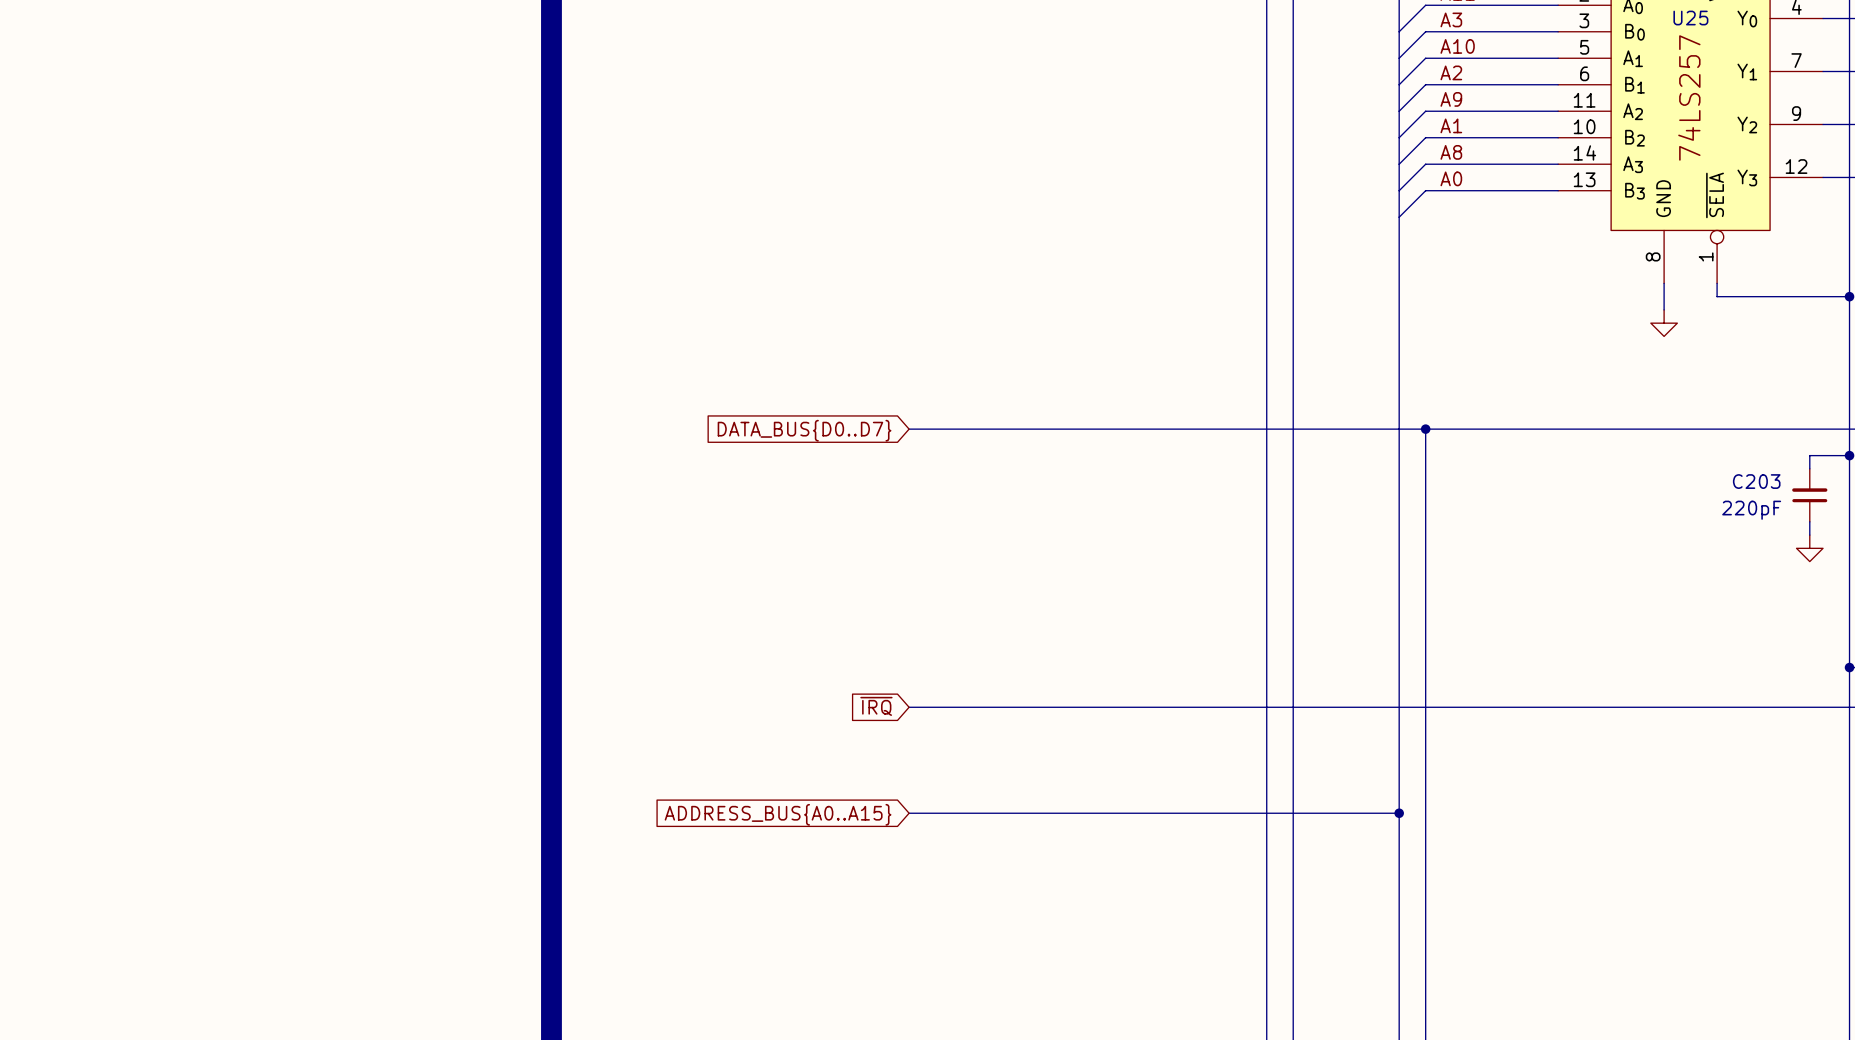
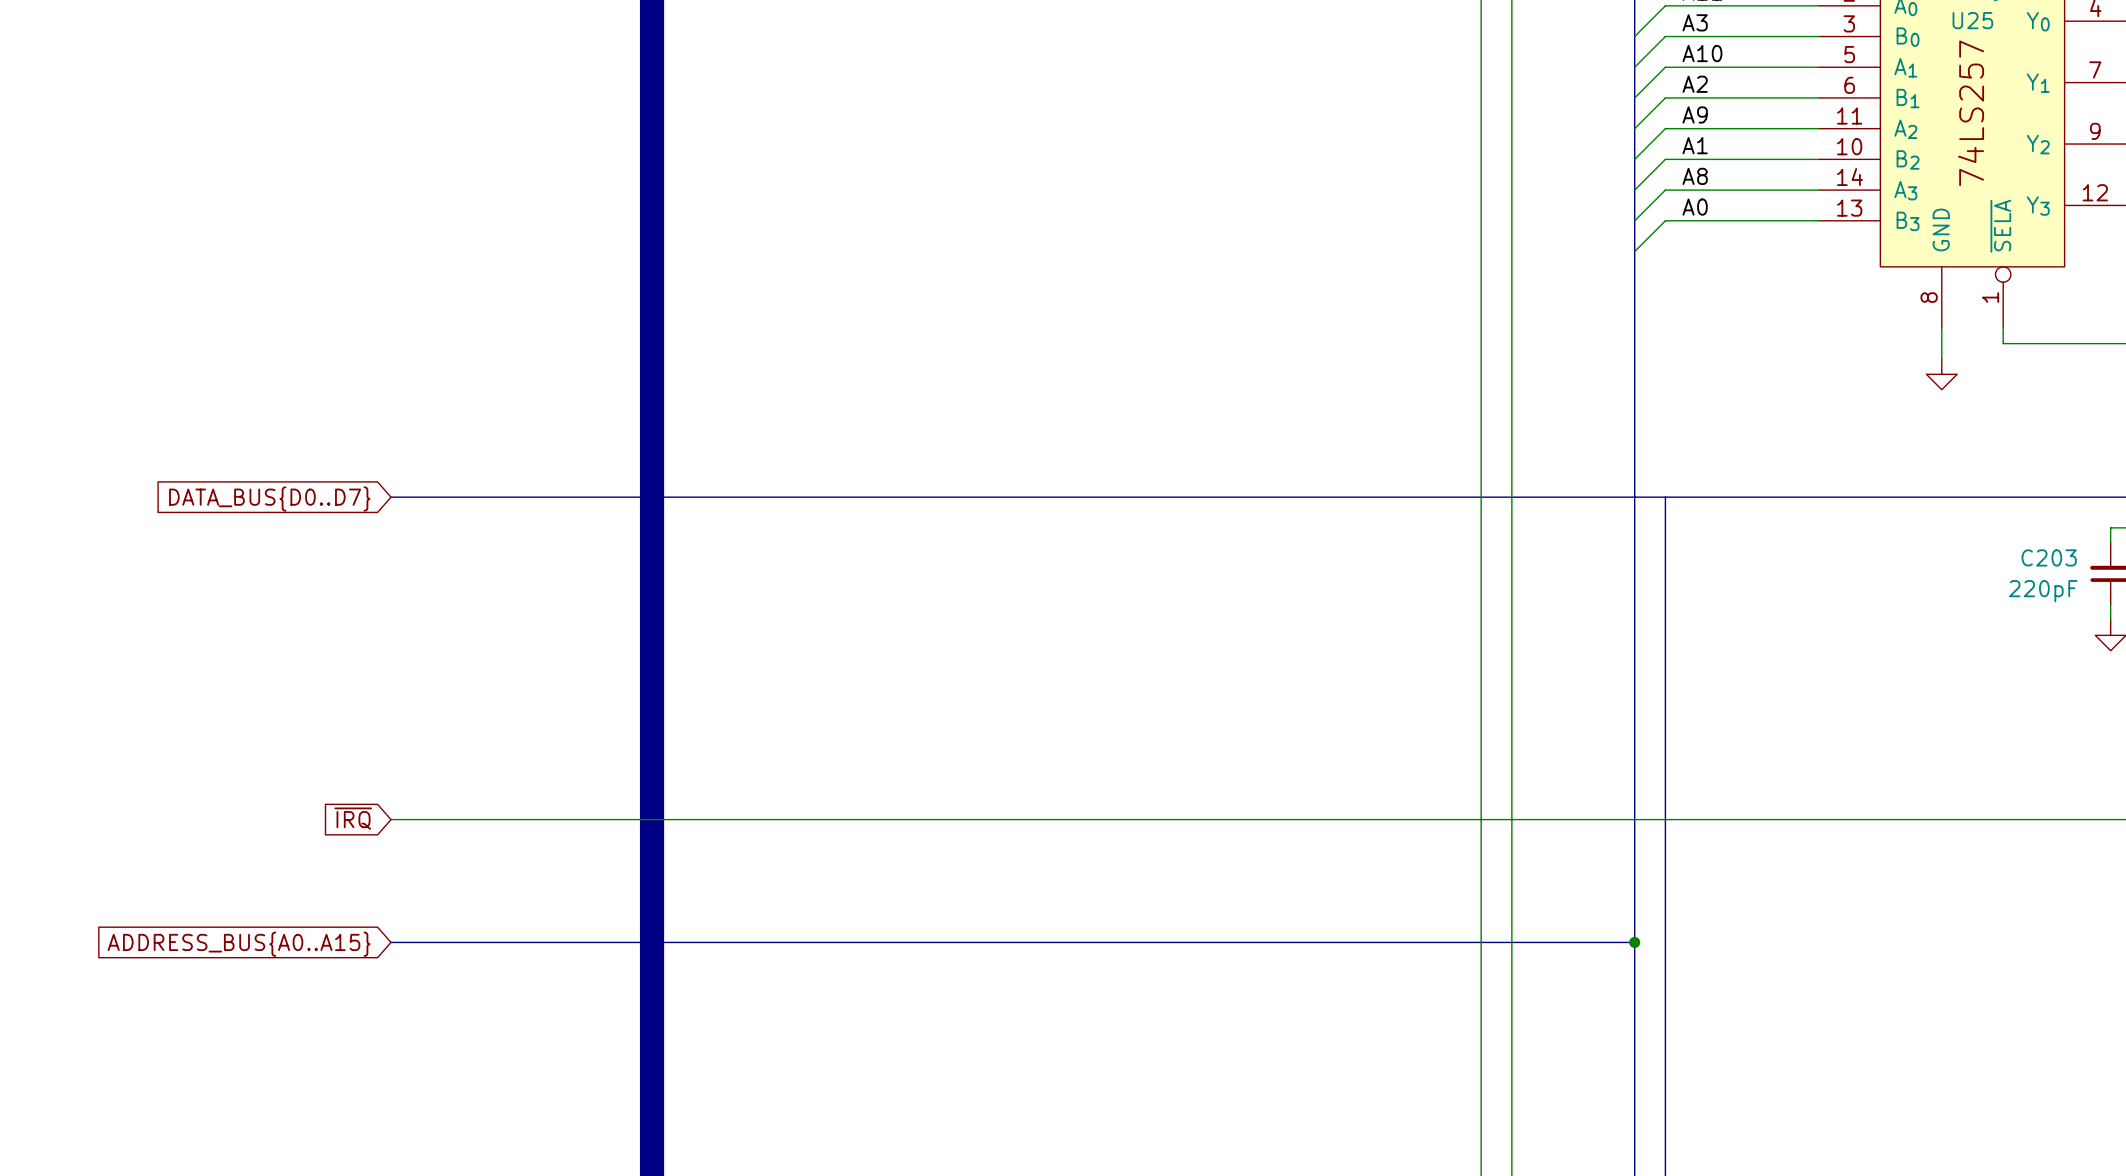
bus: none -> (391, 497) (1066, 497)
junction: (1425, 429) -> none
global label: none -> DATA_BUS{D0..D7} (269, 498)
global label: DATA_BUS{D0..D7} (804, 430) -> none
global label: none -> ~{IRQ} (353, 818)
global label: ~{IRQ} (876, 706) -> none
wire: none -> (391, 819) (1066, 819)
bus: none -> (391, 942) (1066, 942)
global label: none -> ADDRESS_BUS{A0..A15} (239, 944)
global label: ADDRESS_BUS{A0..A15} (778, 814) -> none

